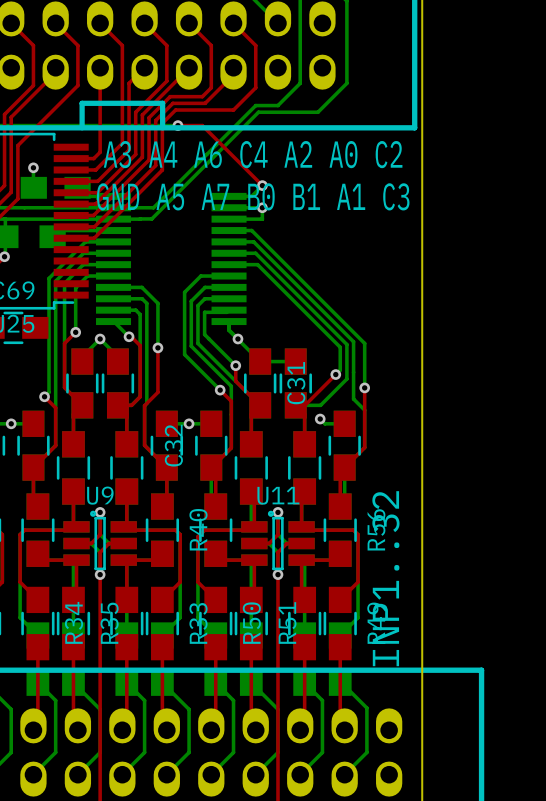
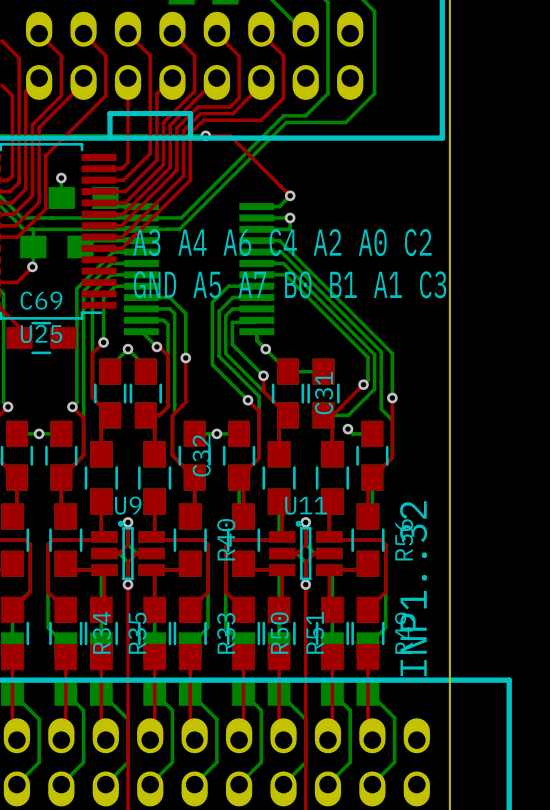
text position: A3 A4 A6 C4 A2 A0 C2 (253, 154) -> A3 A4 A6 C4 A2 A0 C2 (282, 242)
text position: GND A5 A7 B0 B1 A1 C3 (253, 196) -> GND A5 A7 B0 B1 A1 C3 (290, 284)

